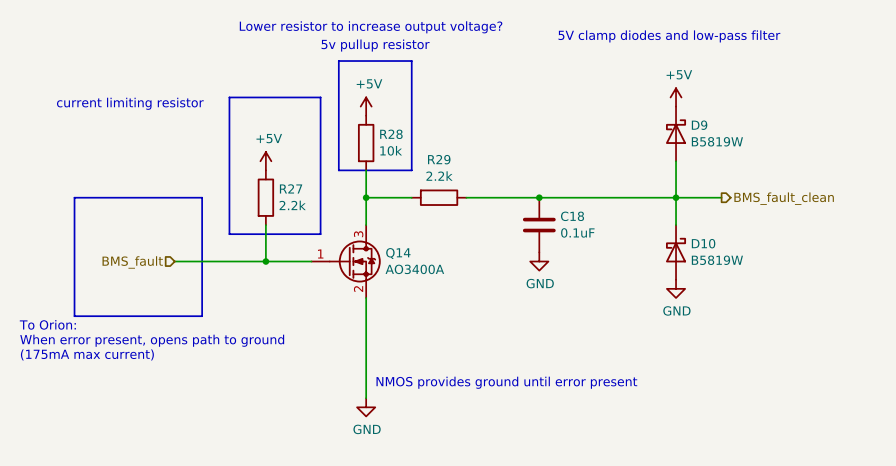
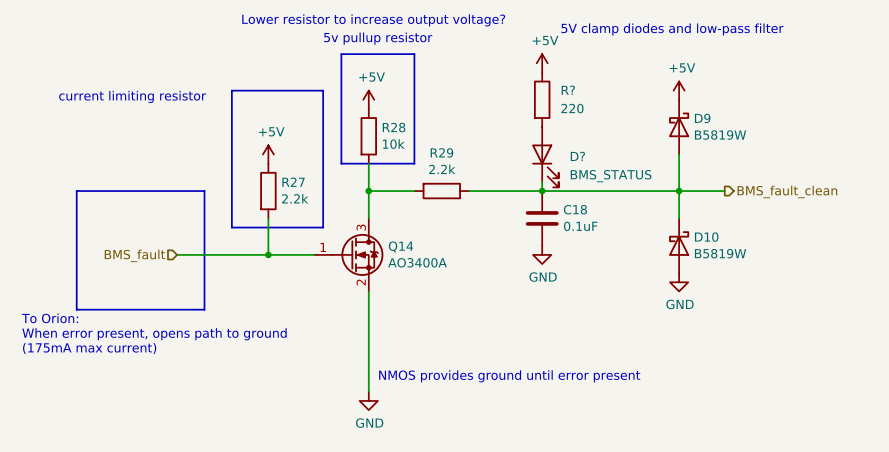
power symbol: none -> +5V (542, 63)
R?: none -> 220 (542, 99)
D?: none -> BMS_STATUS (545, 157)
wire: none -> (542, 181) (542, 191)

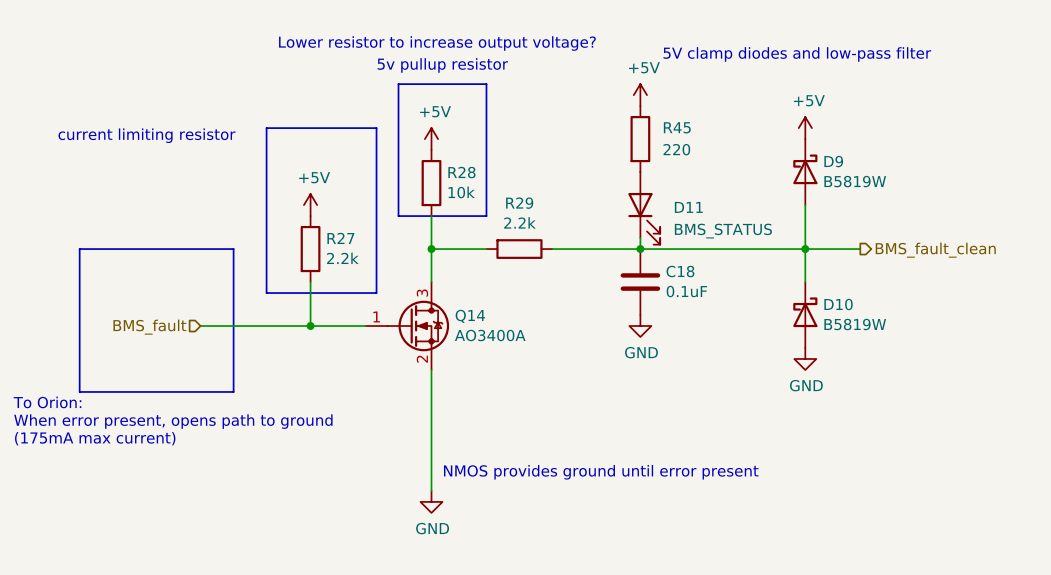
R? name: R? (568, 90) -> R45 (677, 127)
D? name: D? (577, 156) -> D11 (688, 207)

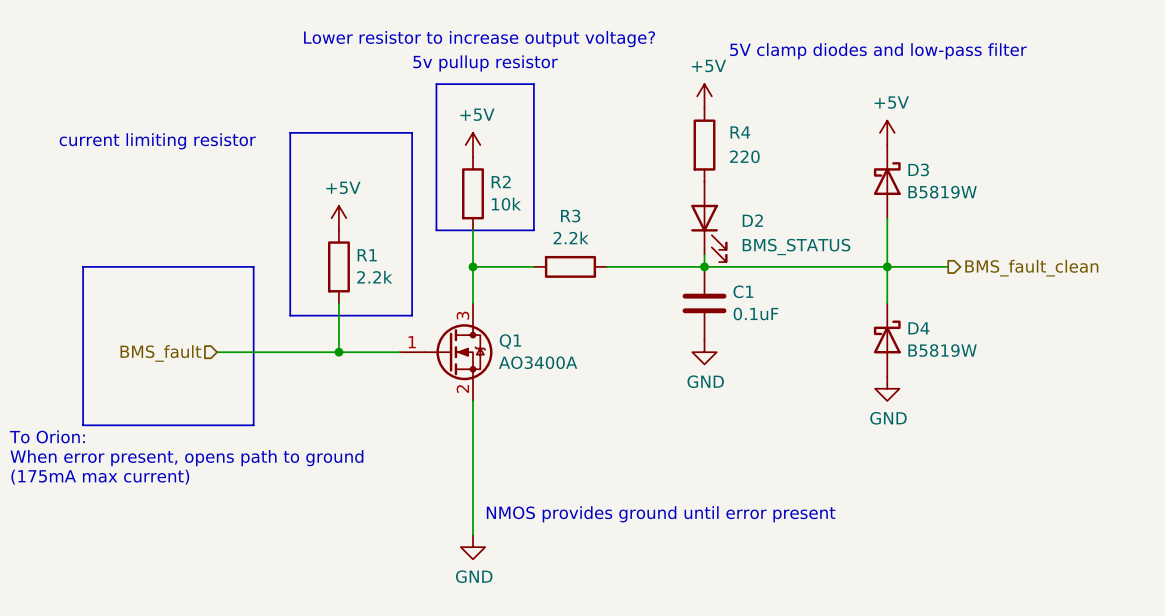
R45 name: R45 (677, 127) -> R4 (740, 132)
D9 name: D9 (833, 161) -> D3 (918, 169)
R28 name: R28 (461, 172) -> R2 (501, 182)
R29 name: R29 (519, 203) -> R3 (570, 216)
D11 name: D11 (688, 207) -> D2 (752, 220)
R27 name: R27 (340, 238) -> R1 (367, 255)
C18 name: C18 (680, 271) -> C1 (743, 291)
D10 name: D10 (838, 304) -> D4 (918, 328)
Q14 name: Q14 (470, 316) -> Q1 (510, 341)

